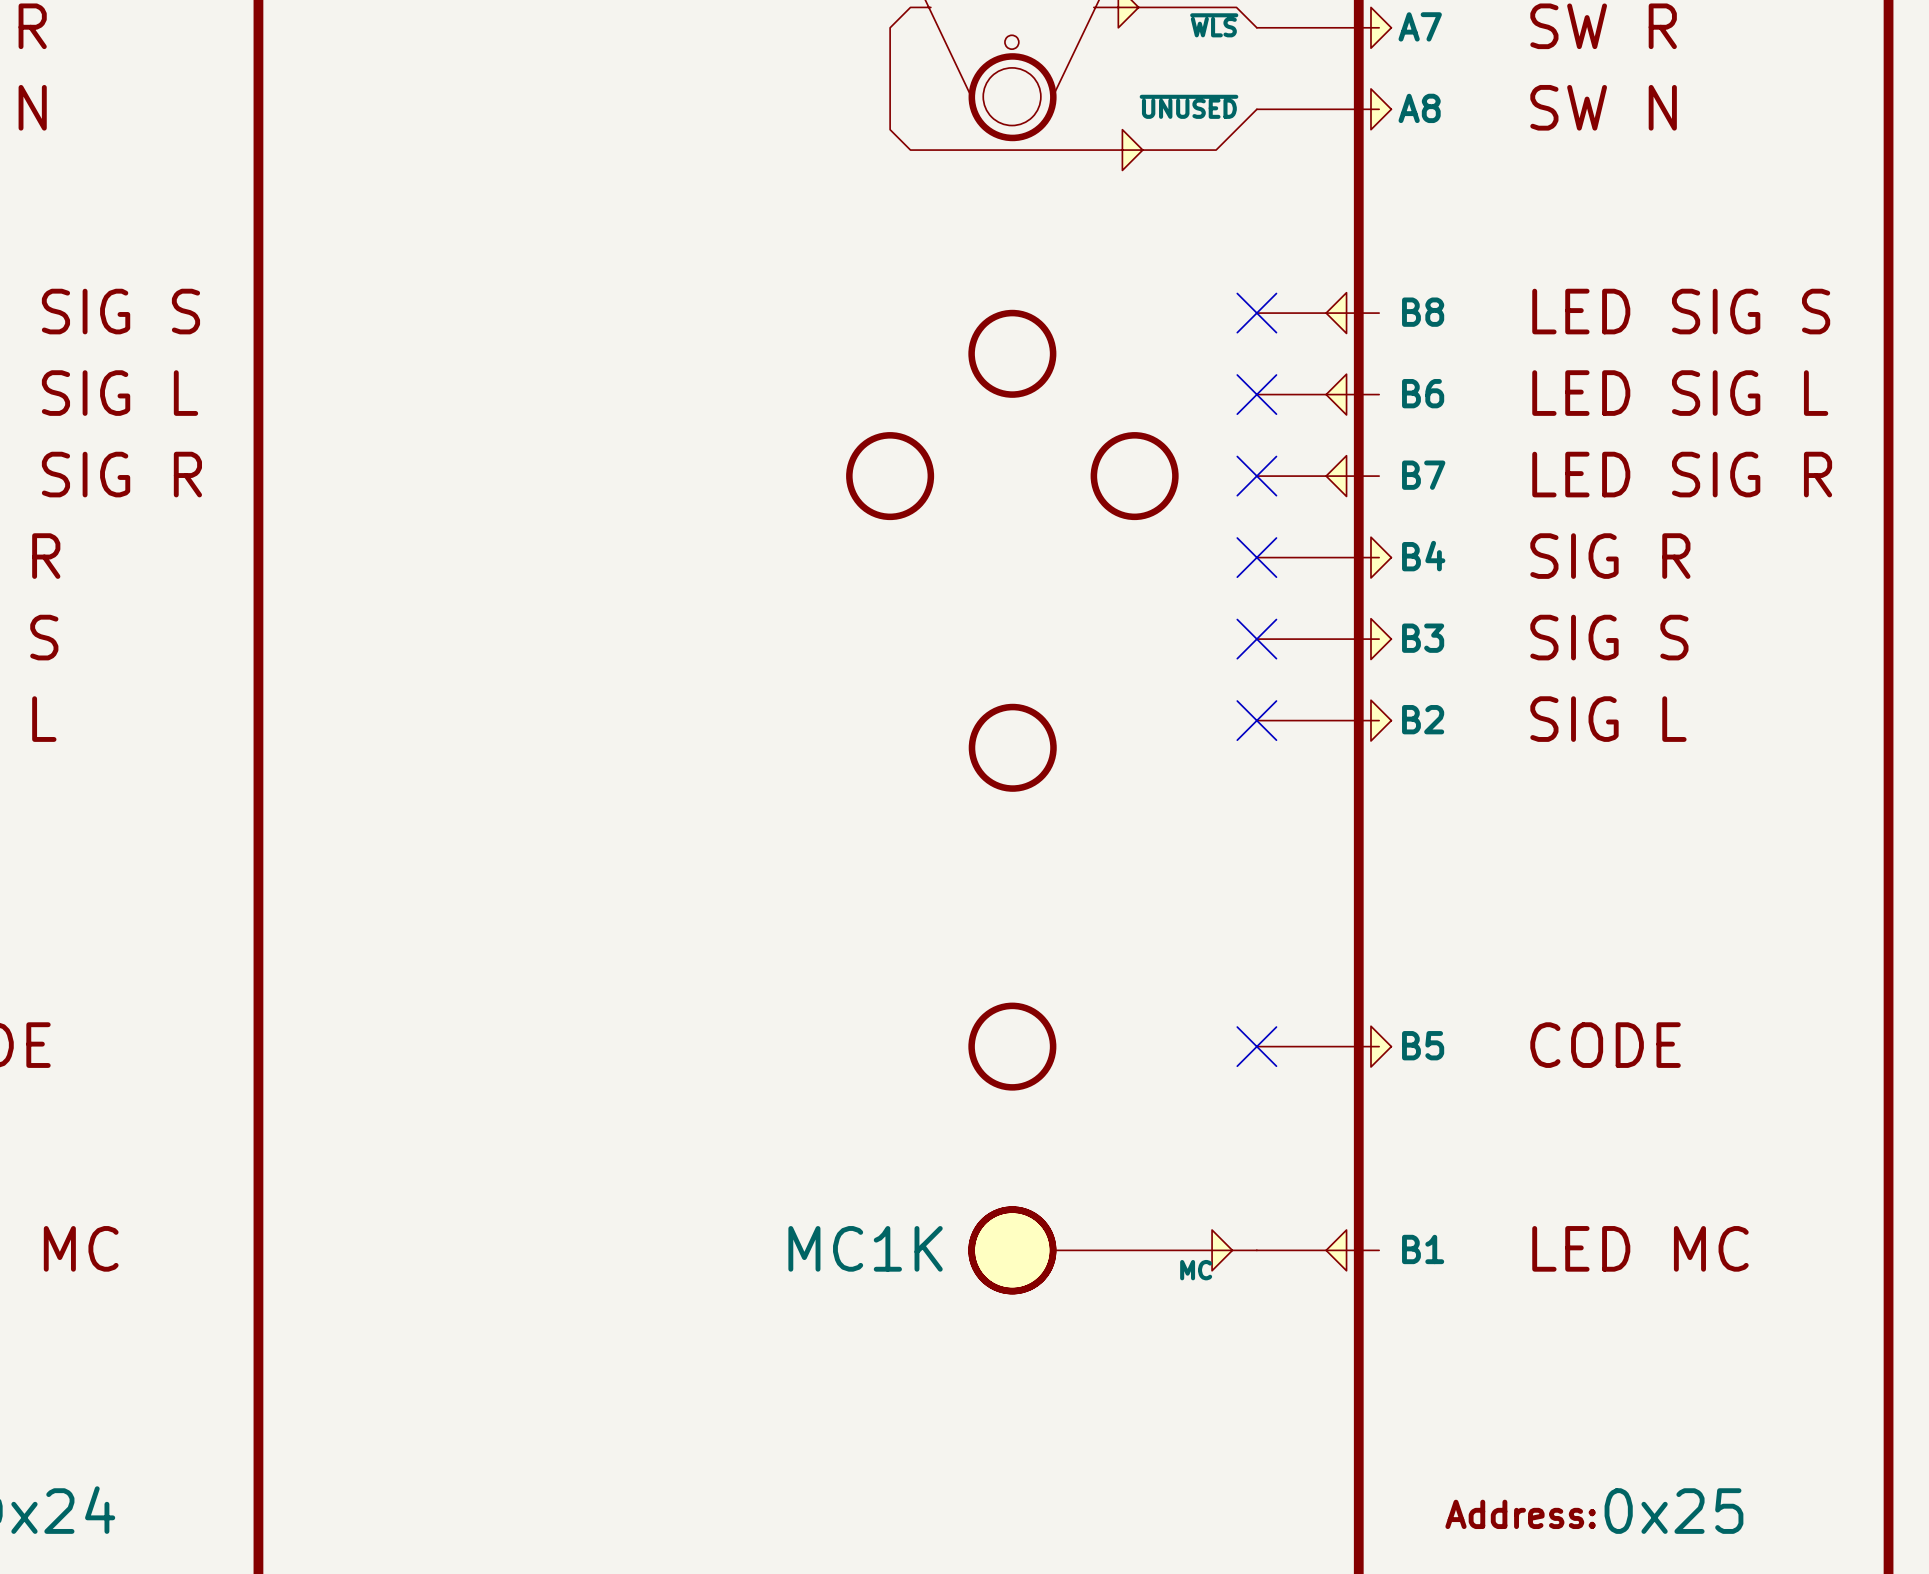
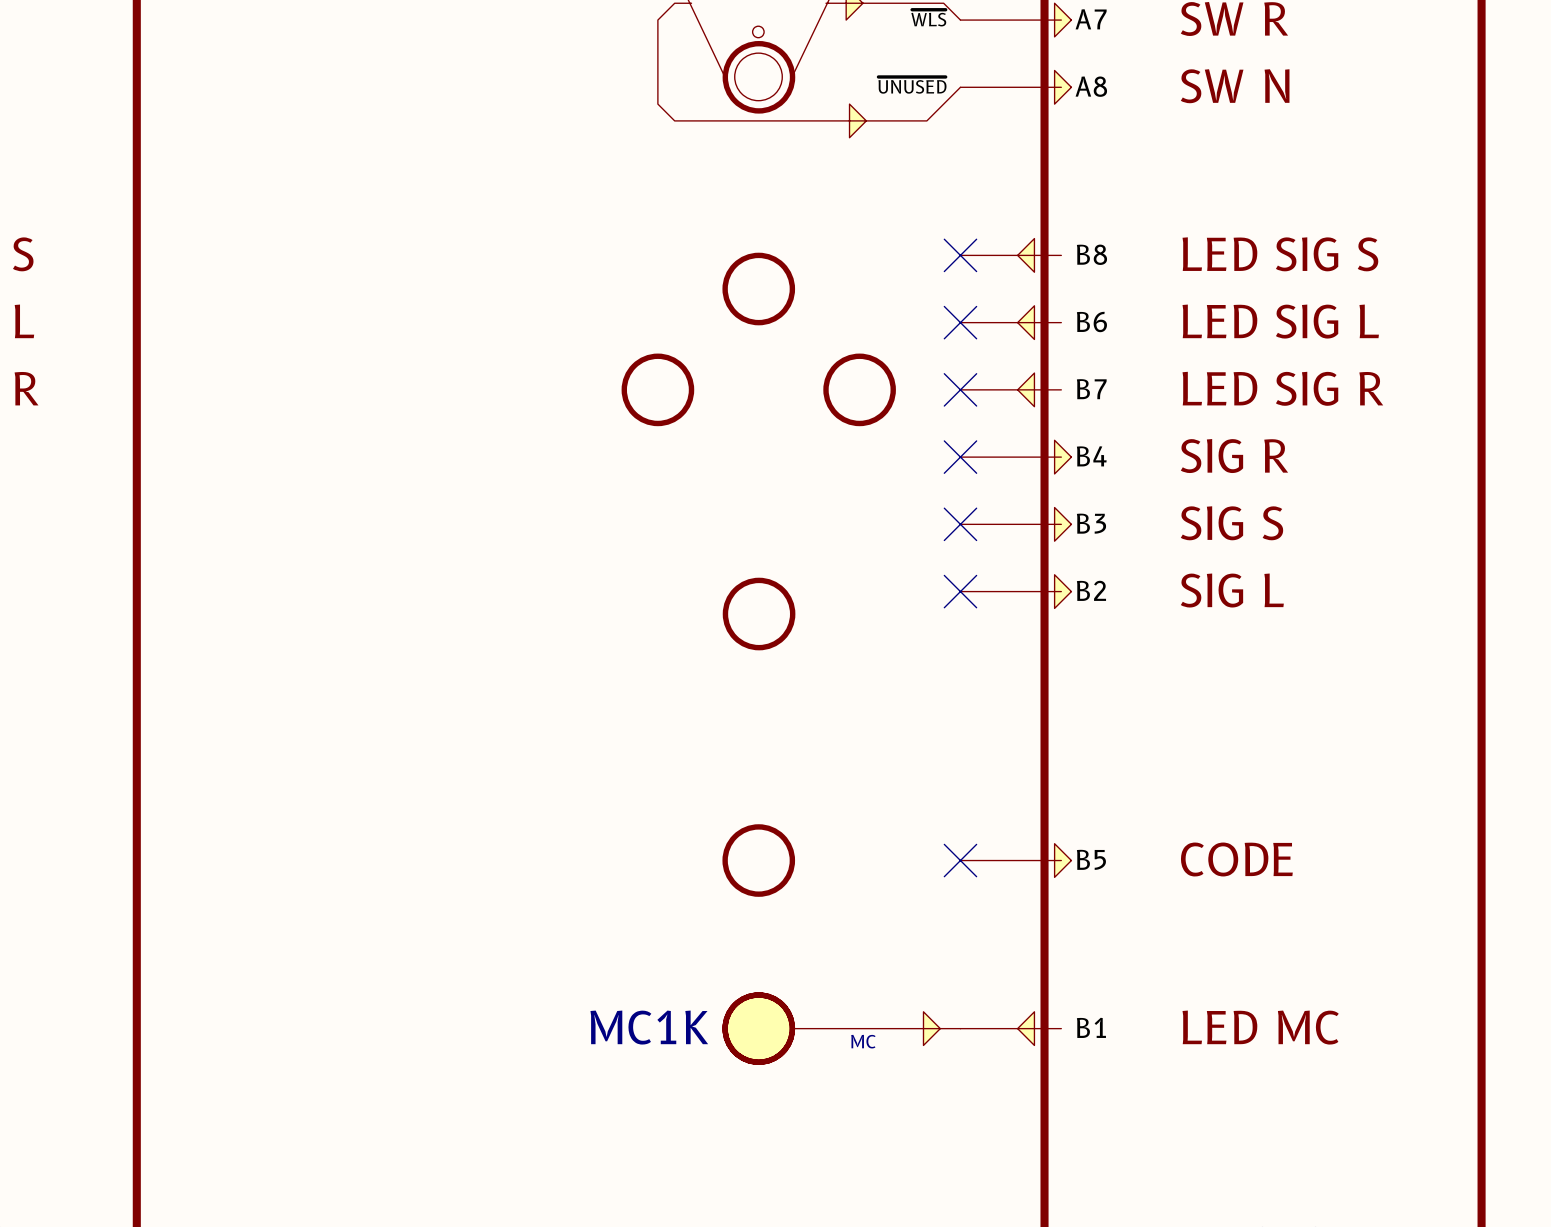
part value position: MC (1196, 1270) -> MC (863, 1041)

